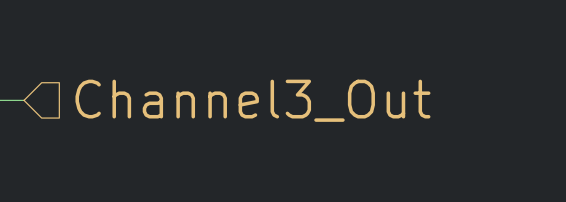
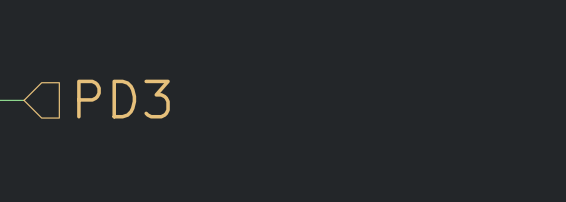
hierarchical label: Channel3_Out (252, 100) -> PD3 (123, 99)

